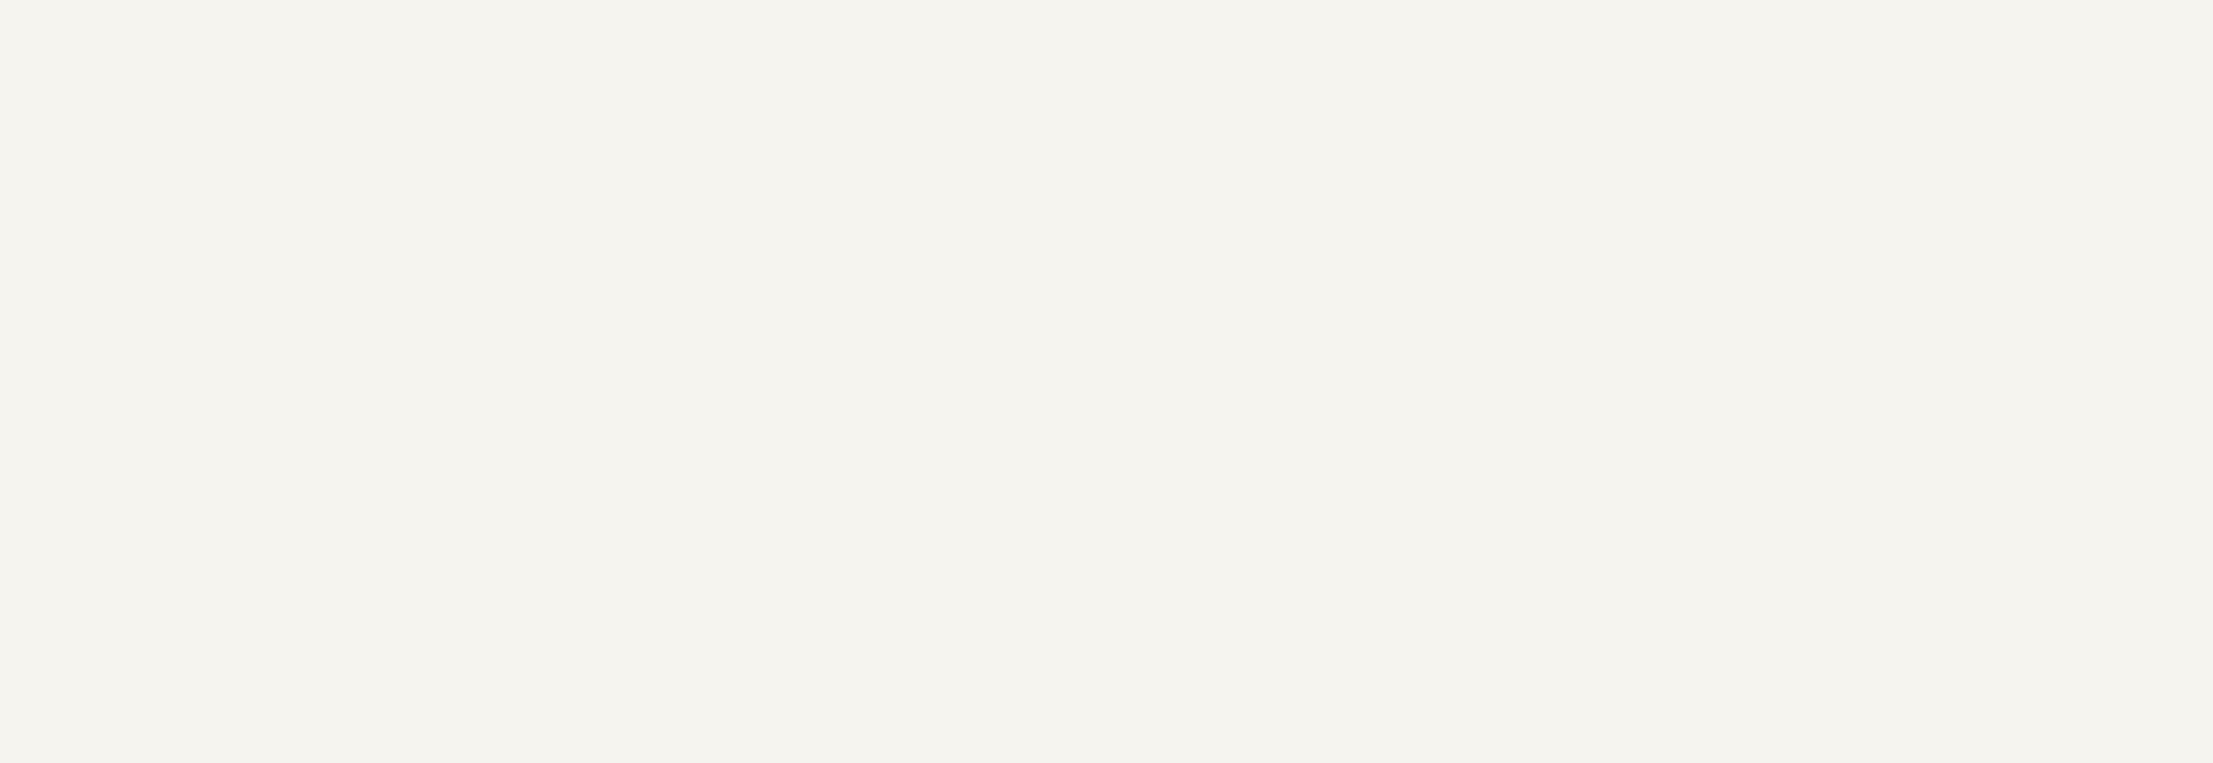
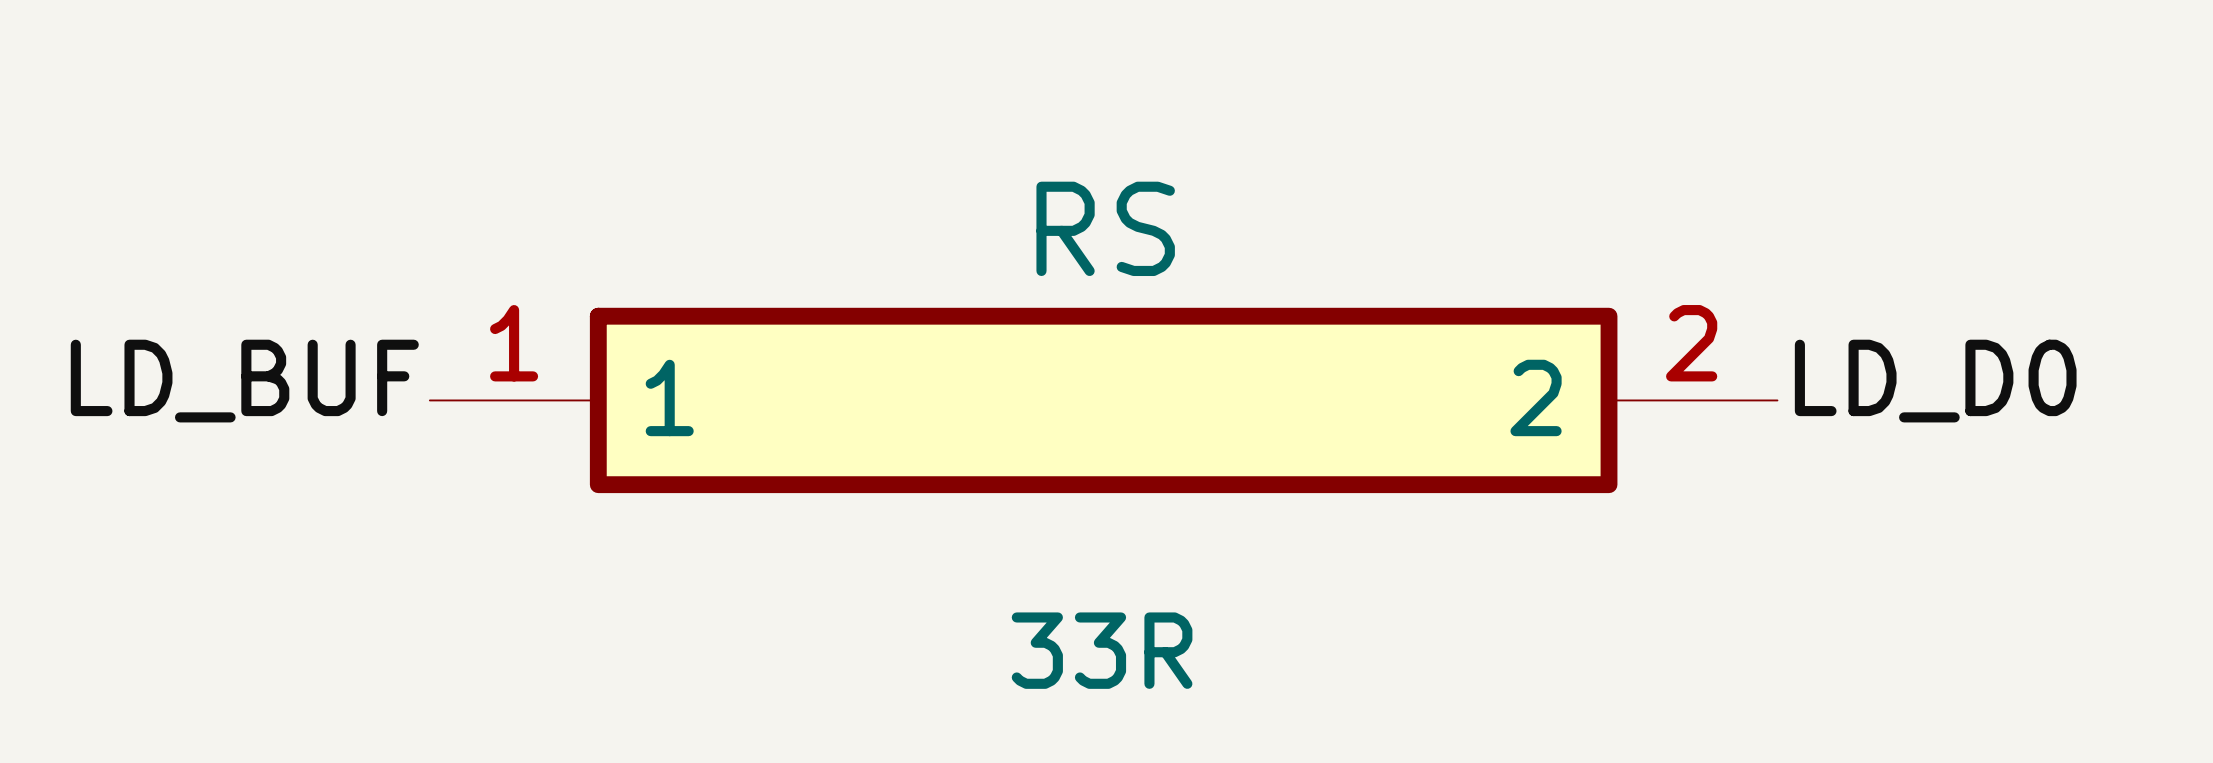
label: none -> LD_BUF (244, 381)
label: none -> LD_D0 (1935, 381)
RS: none -> 33R (1103, 400)

